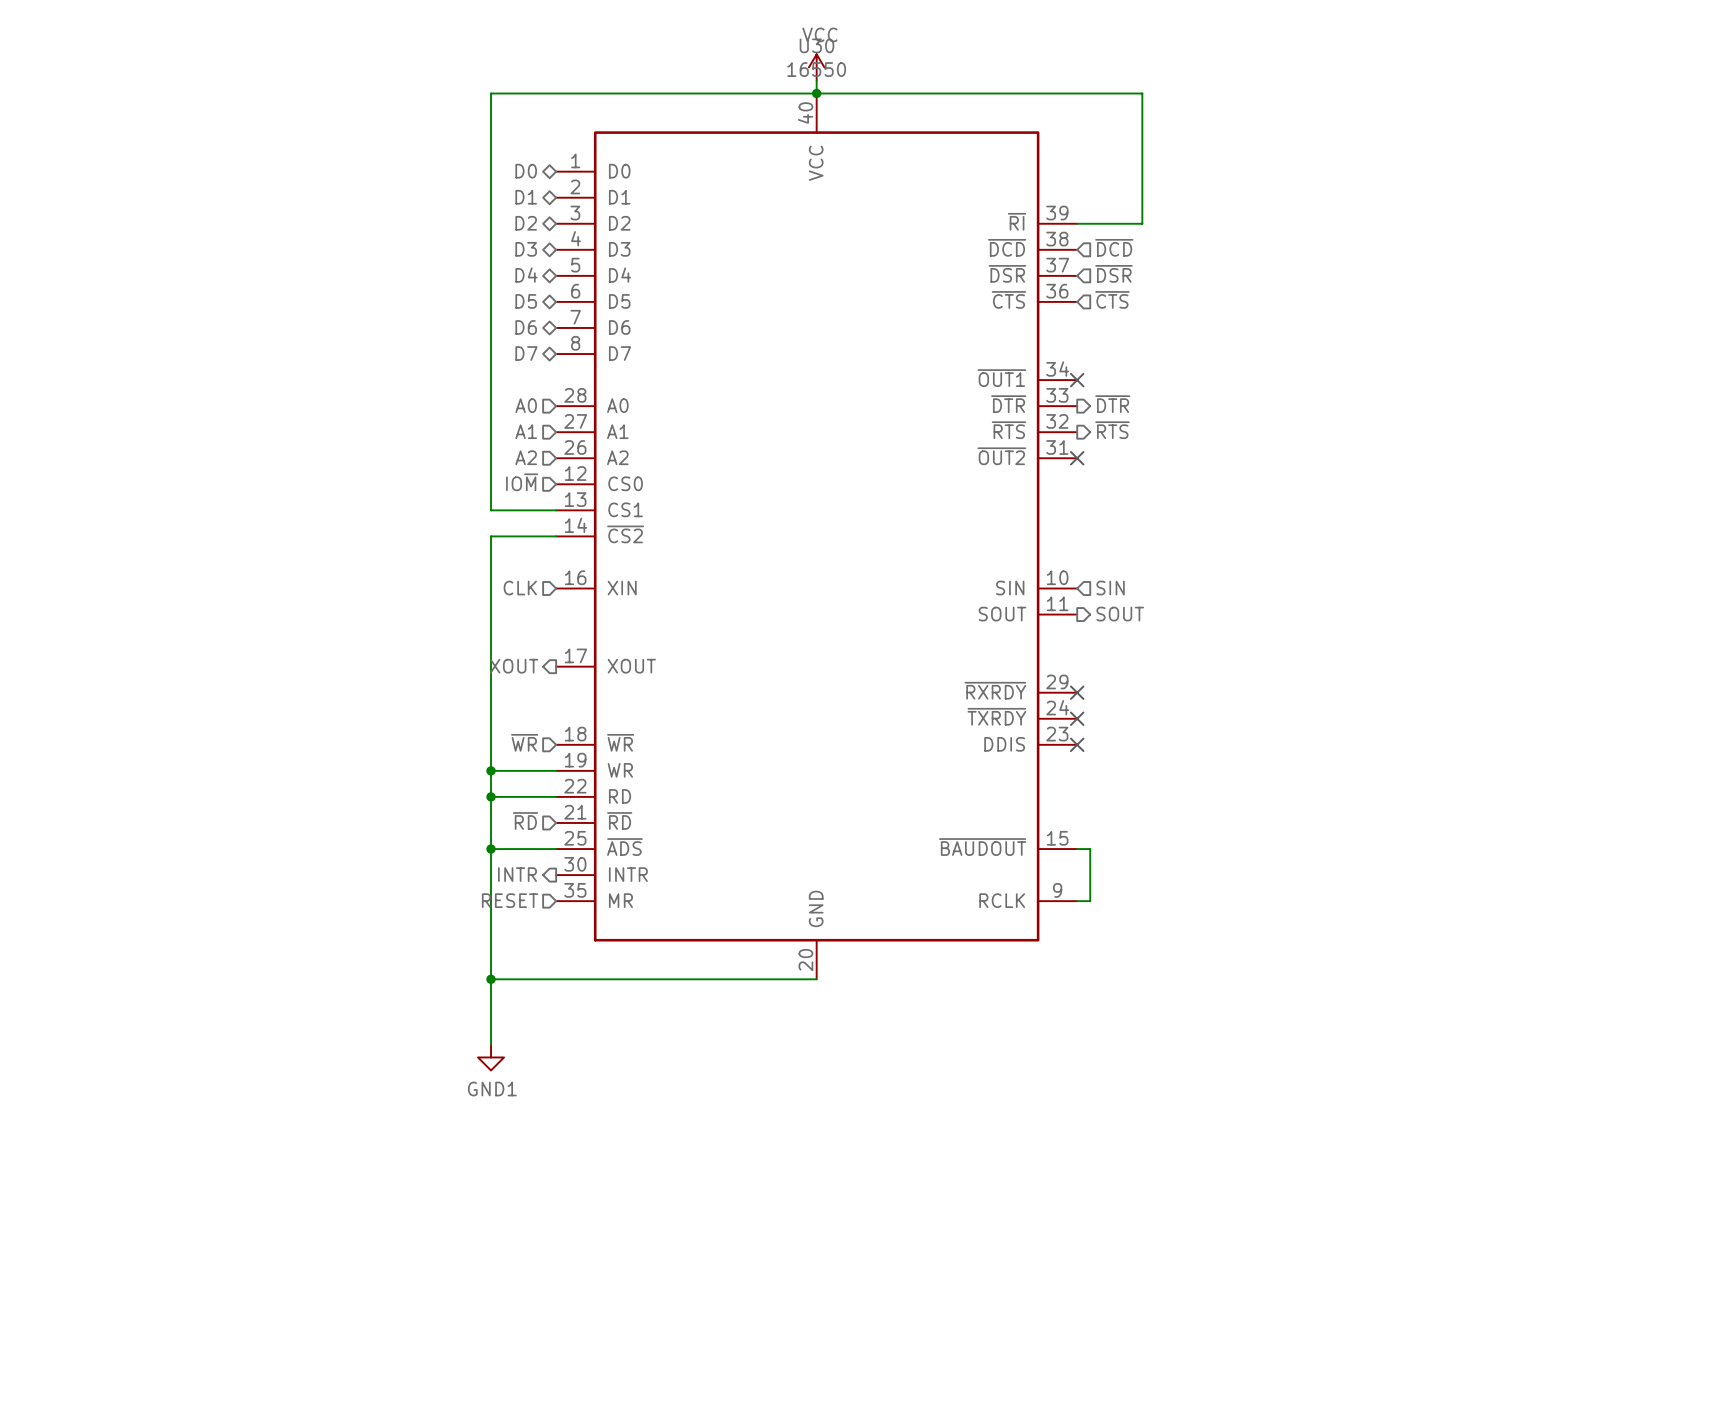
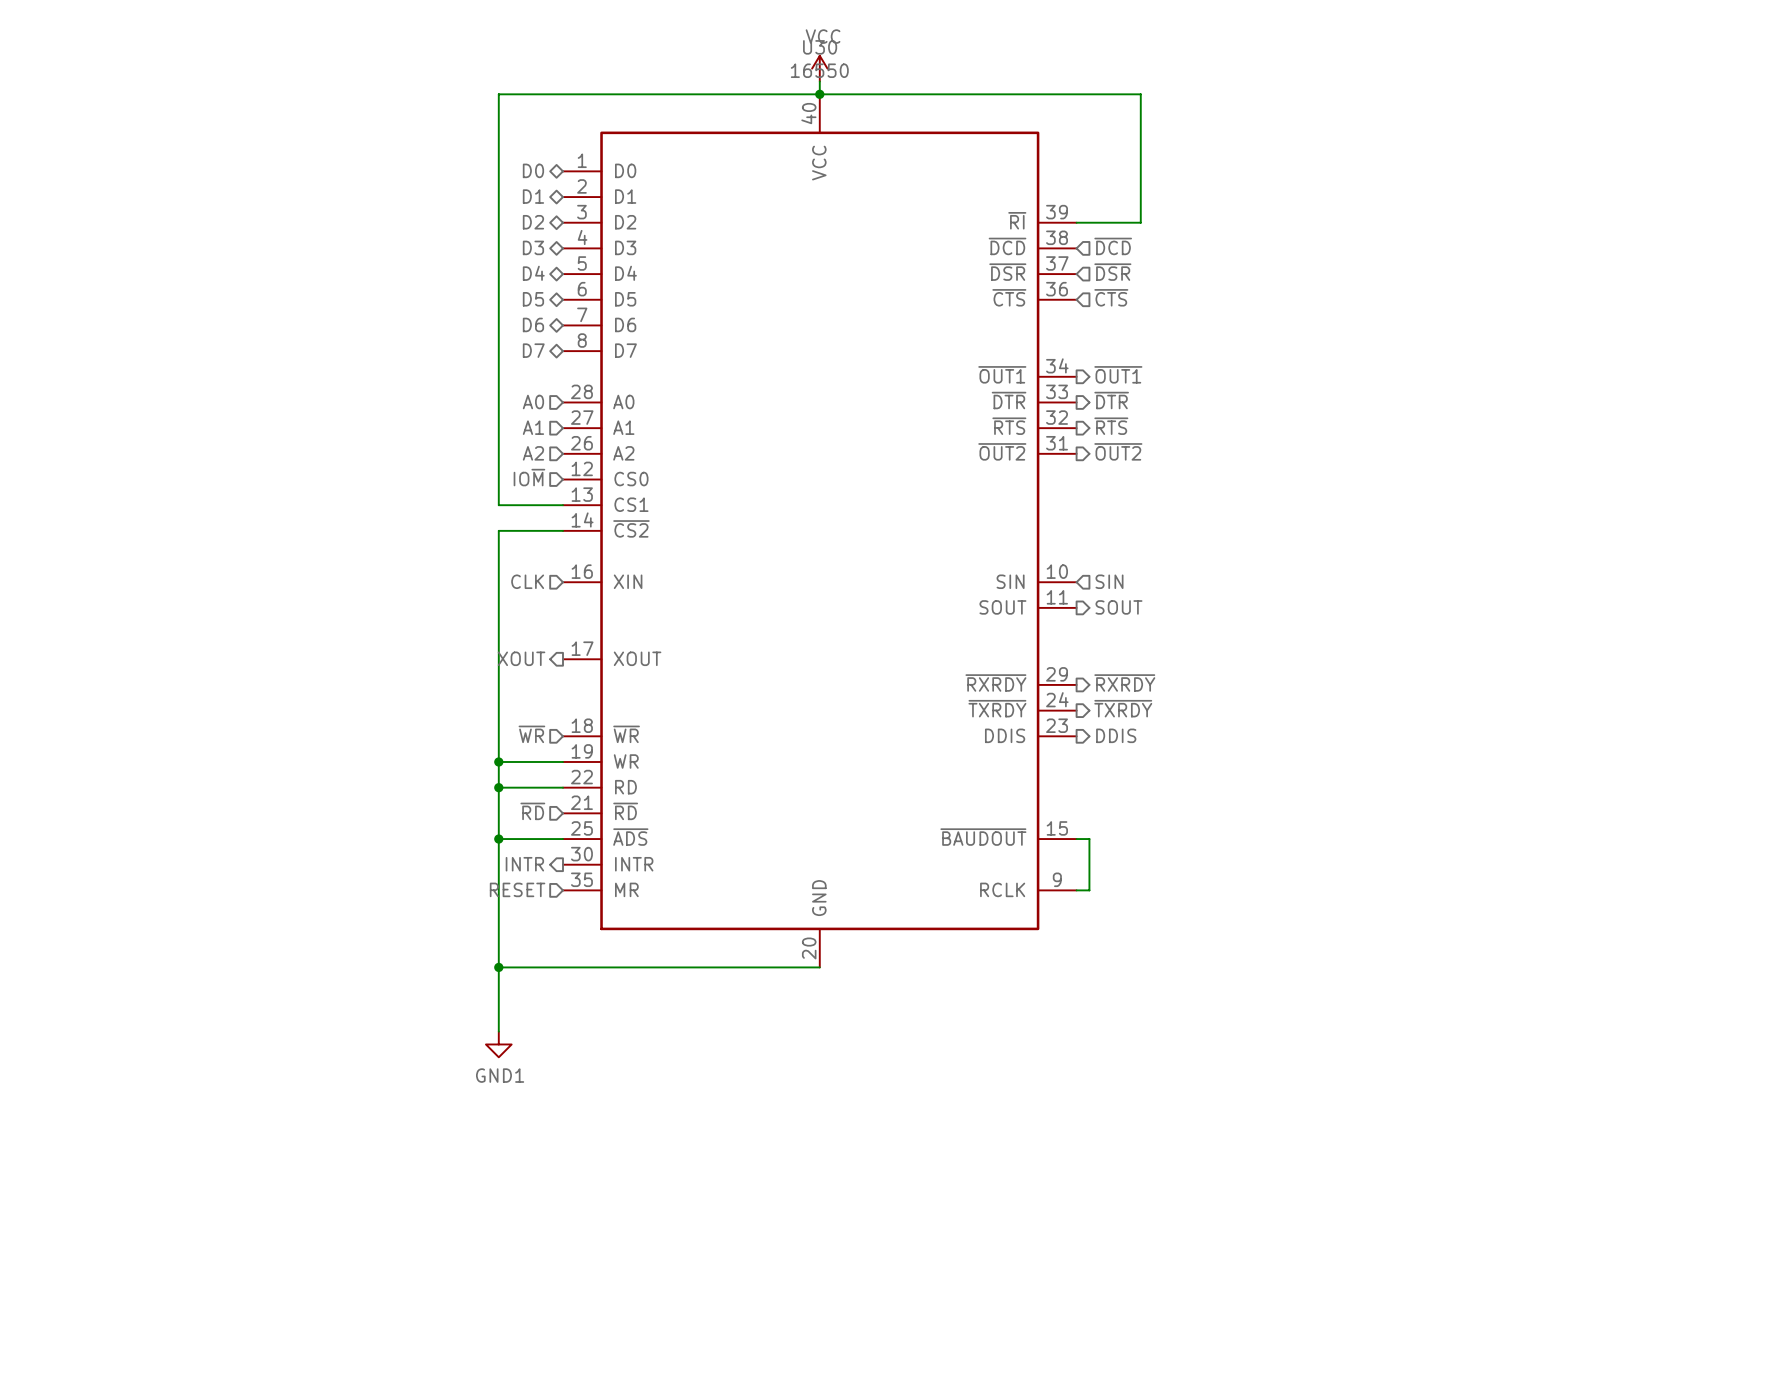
hierarchical label: none -> ~{OUT1} (1118, 374)
no-connect mark: (1077, 380) -> none
hierarchical label: none -> ~{OUT2} (1118, 451)
no-connect mark: (1077, 458) -> none
hierarchical label: none -> ~{RXRDY} (1124, 682)
no-connect mark: (1077, 692) -> none
hierarchical label: none -> ~{TXRDY} (1123, 708)
no-connect mark: (1077, 718) -> none
no-connect mark: (1077, 744) -> none
hierarchical label: none -> DDIS (1116, 735)

